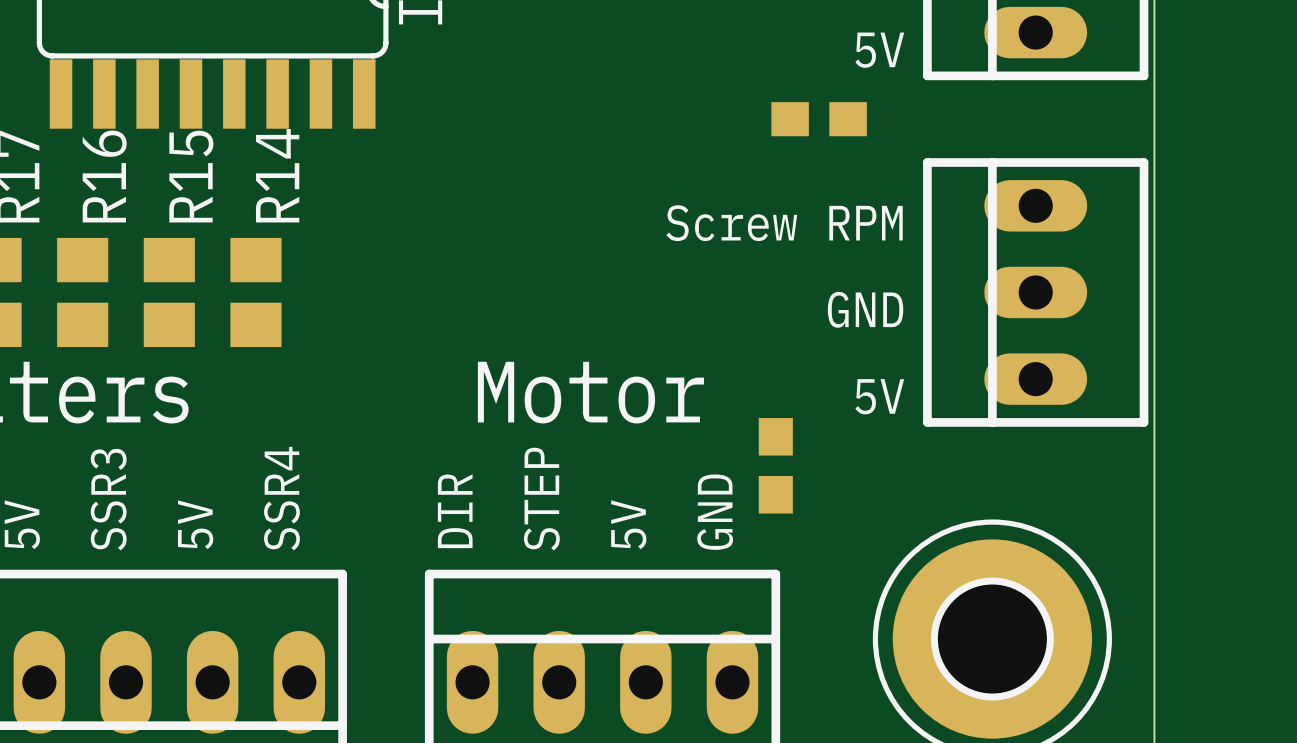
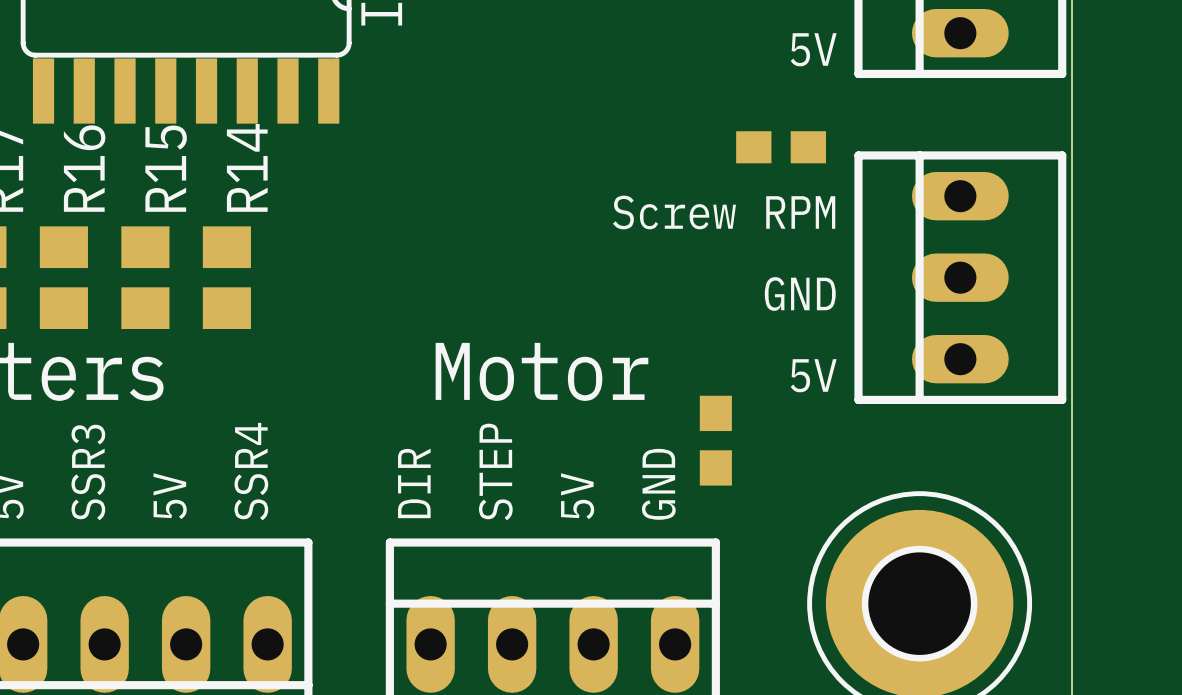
part position: (819, 119) -> (781, 147)

